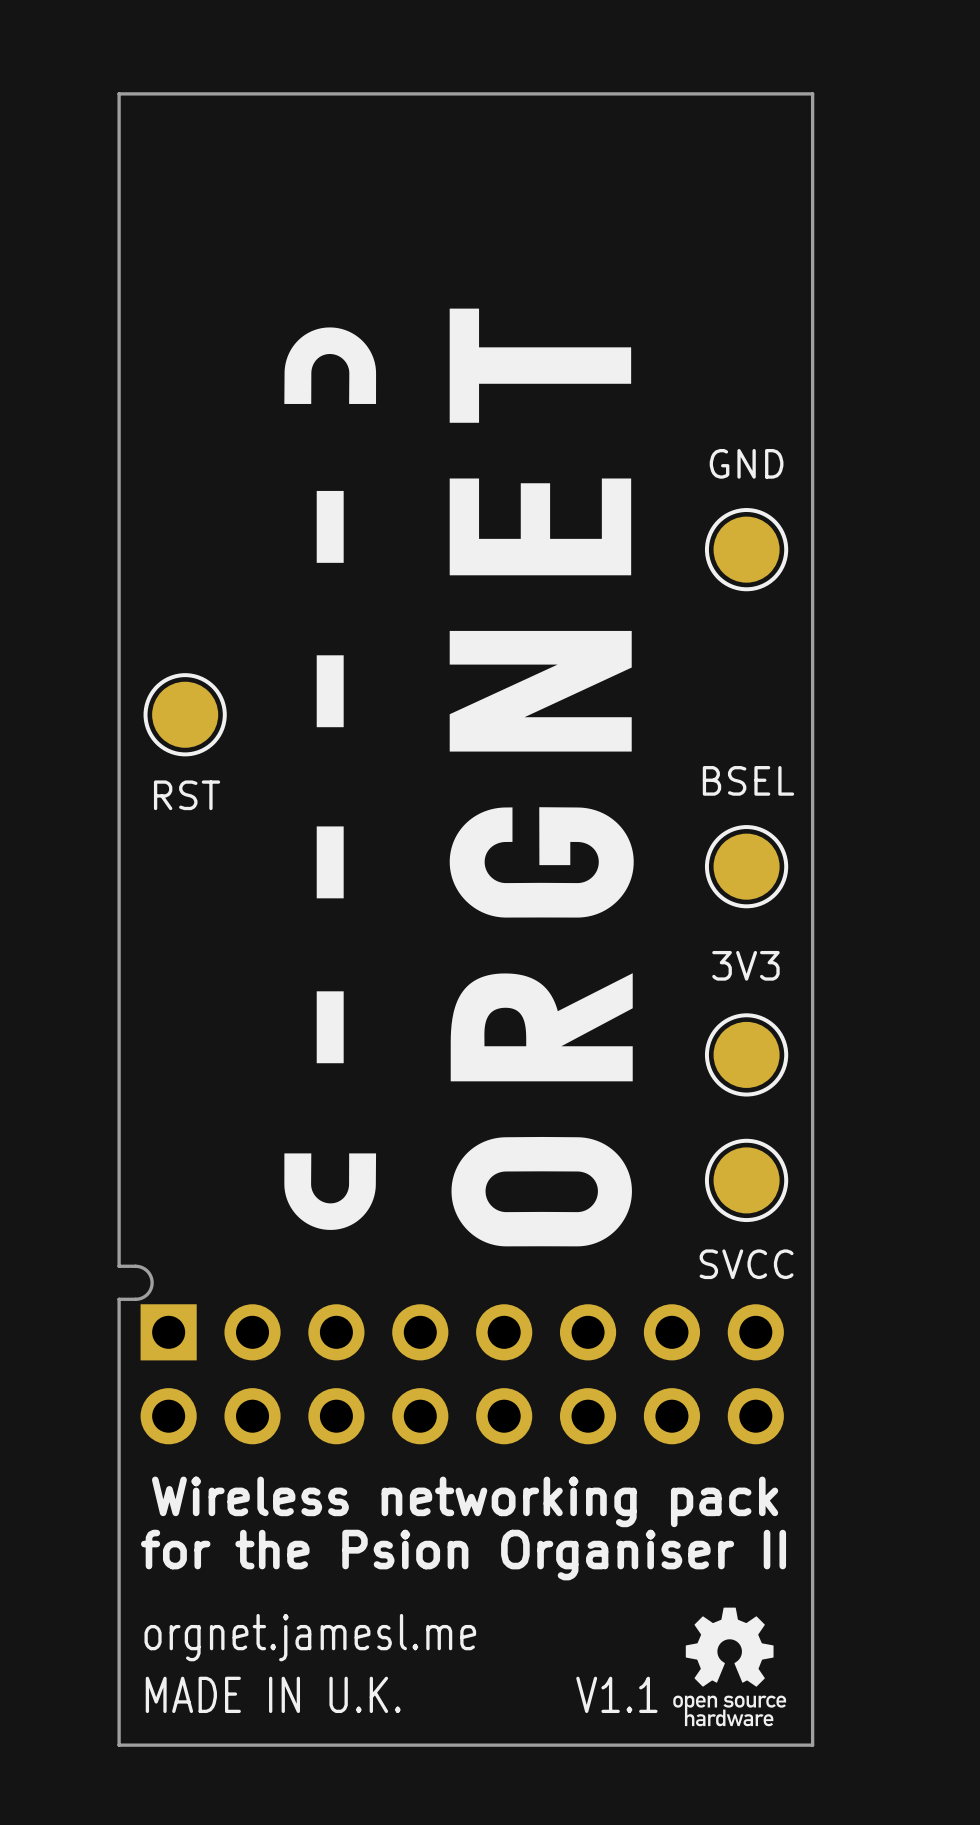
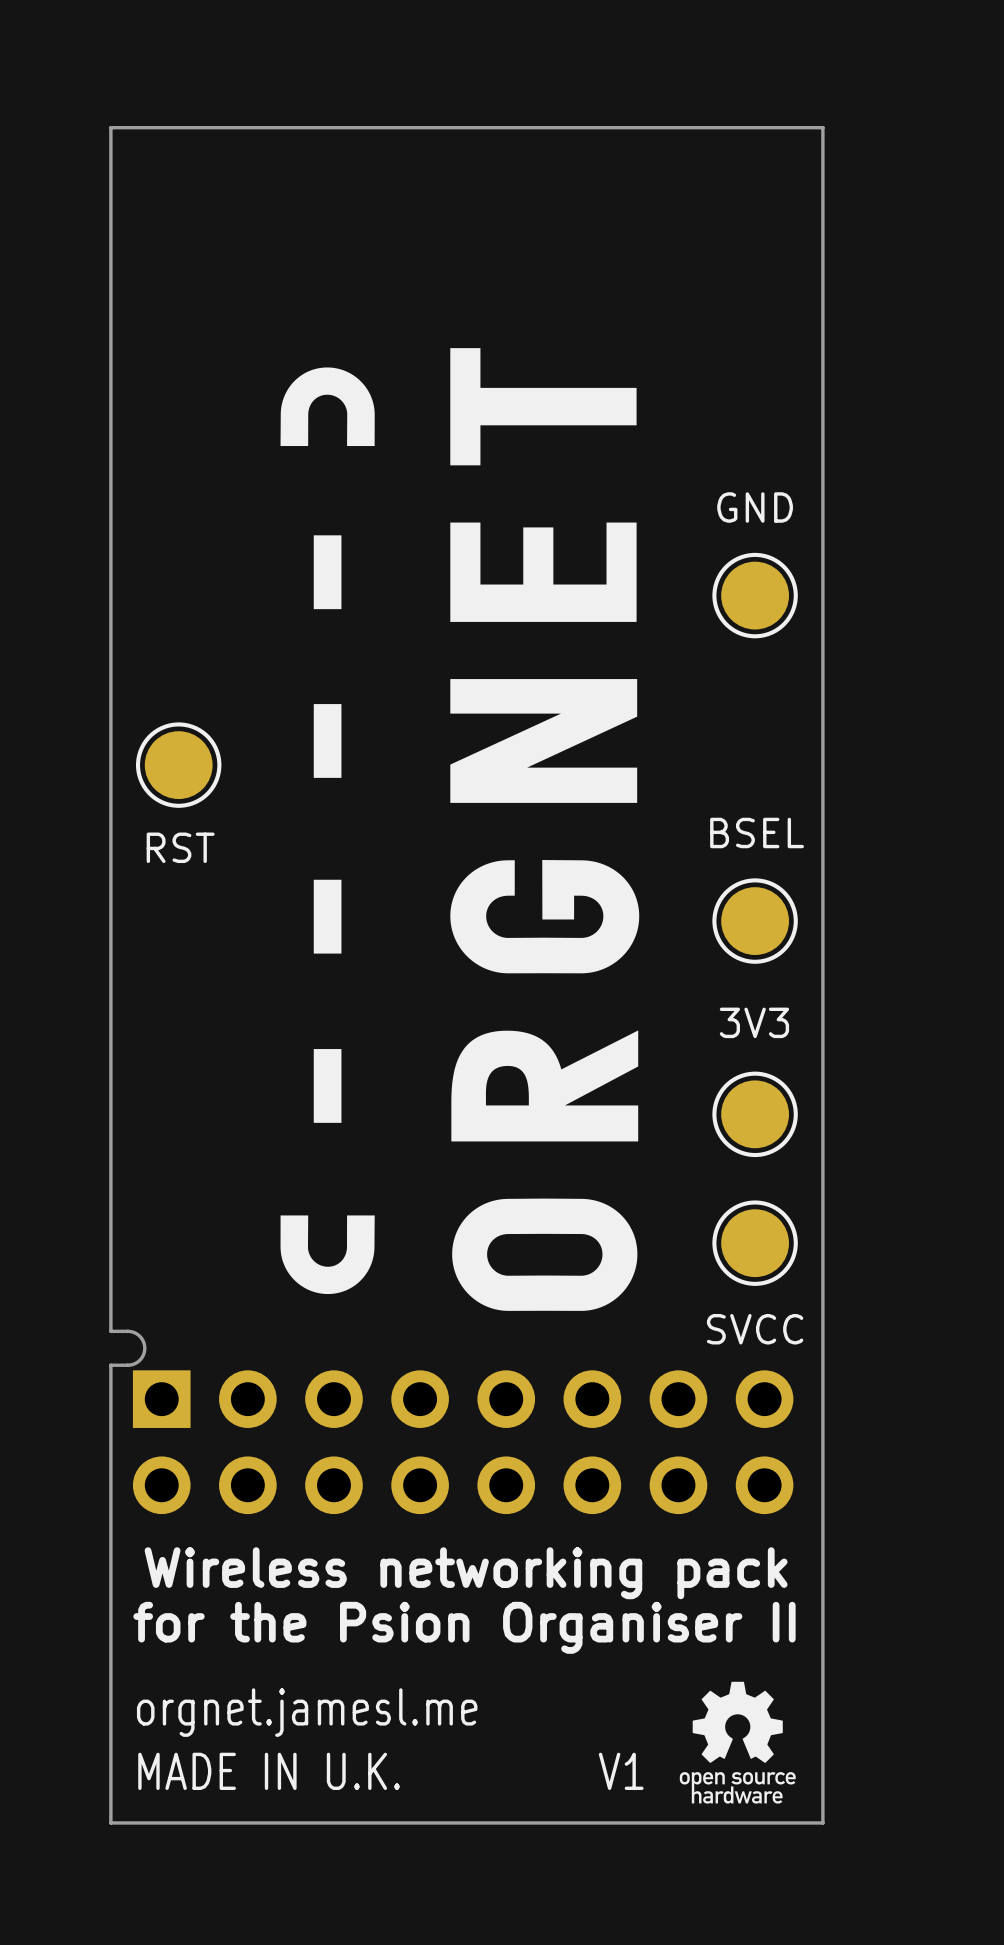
text: V1.1 (616, 1694) -> V1 (621, 1771)

